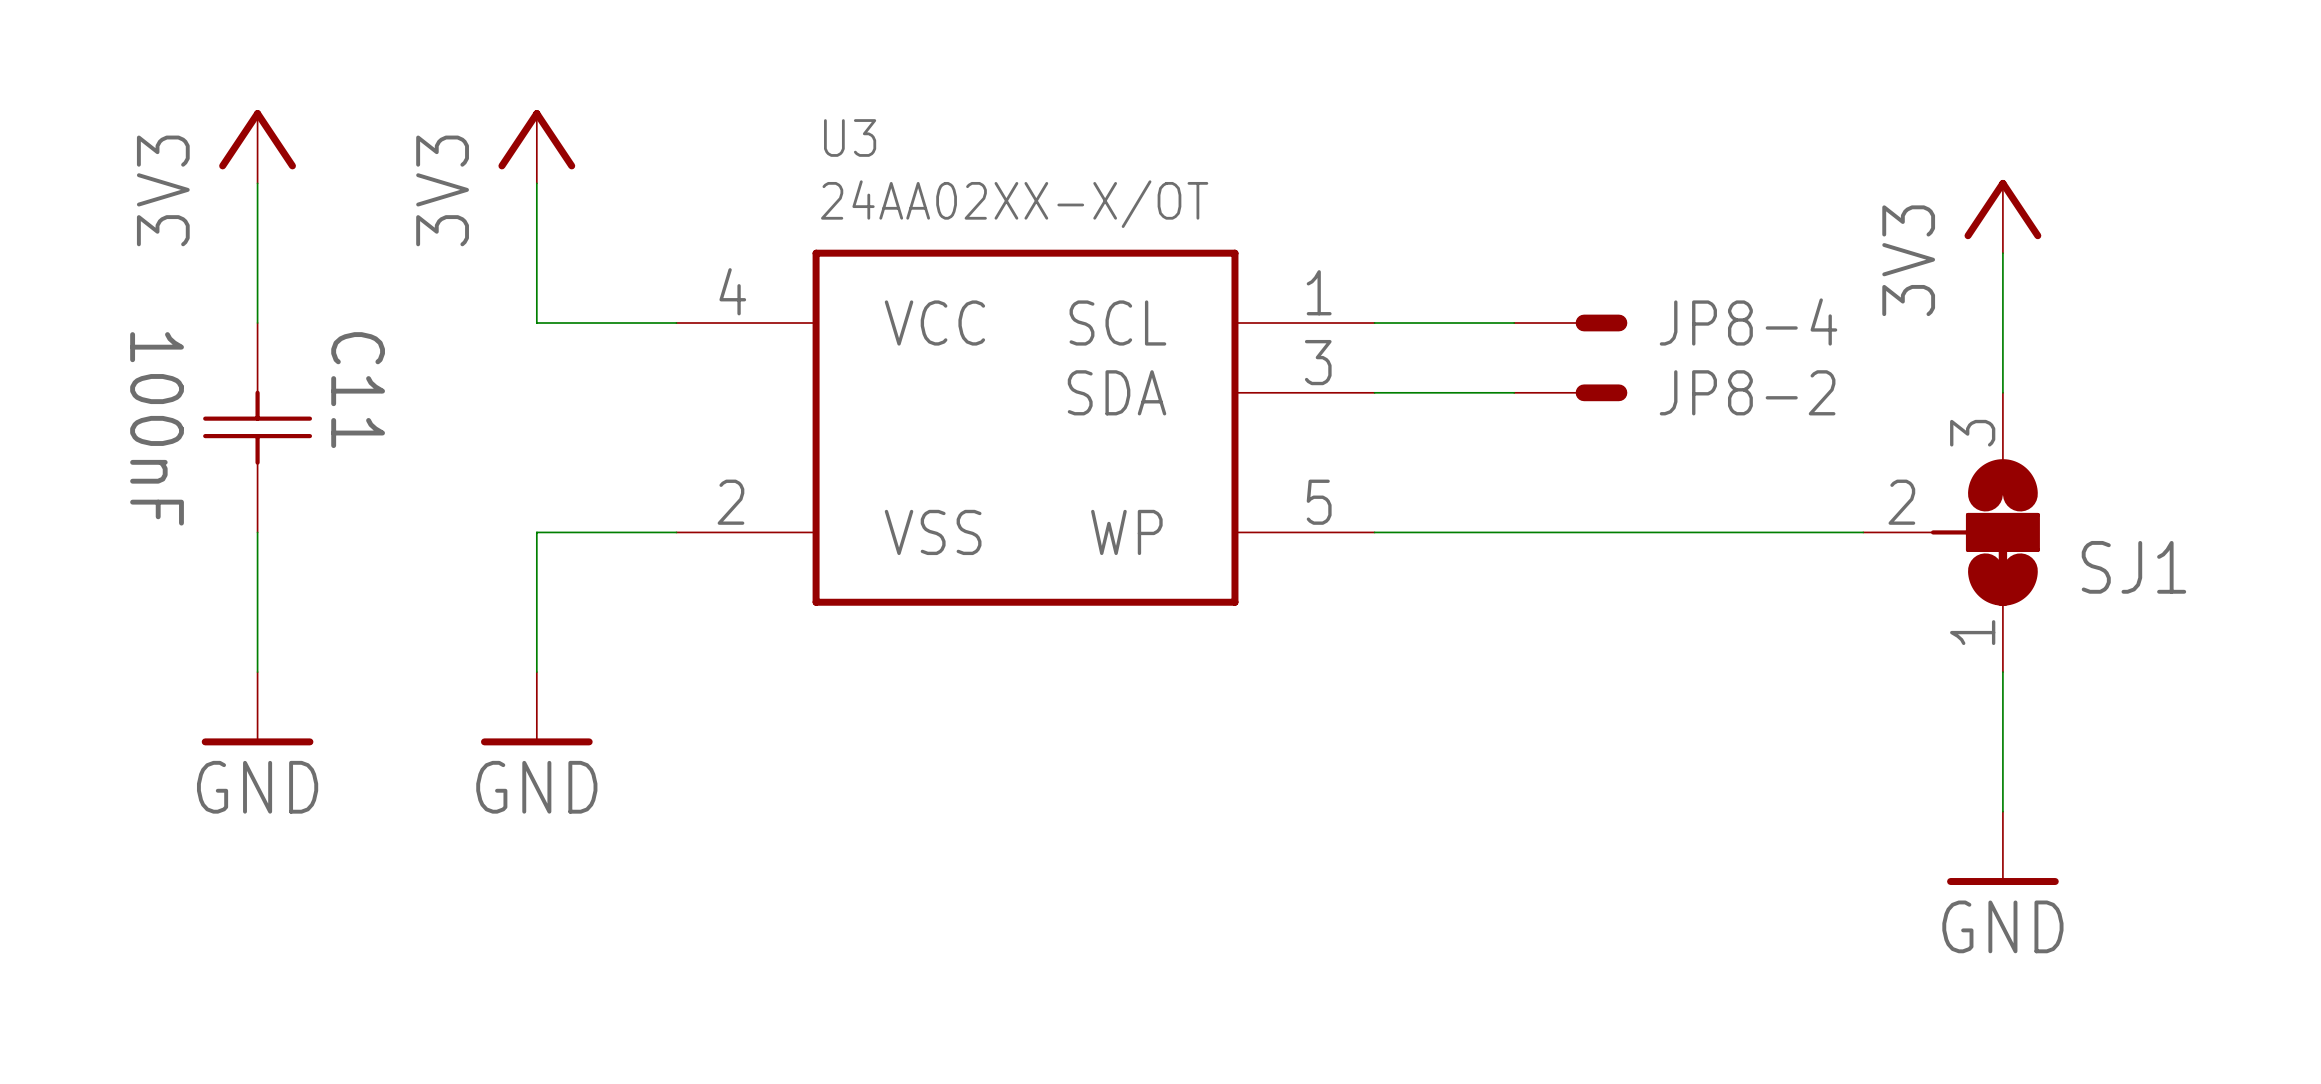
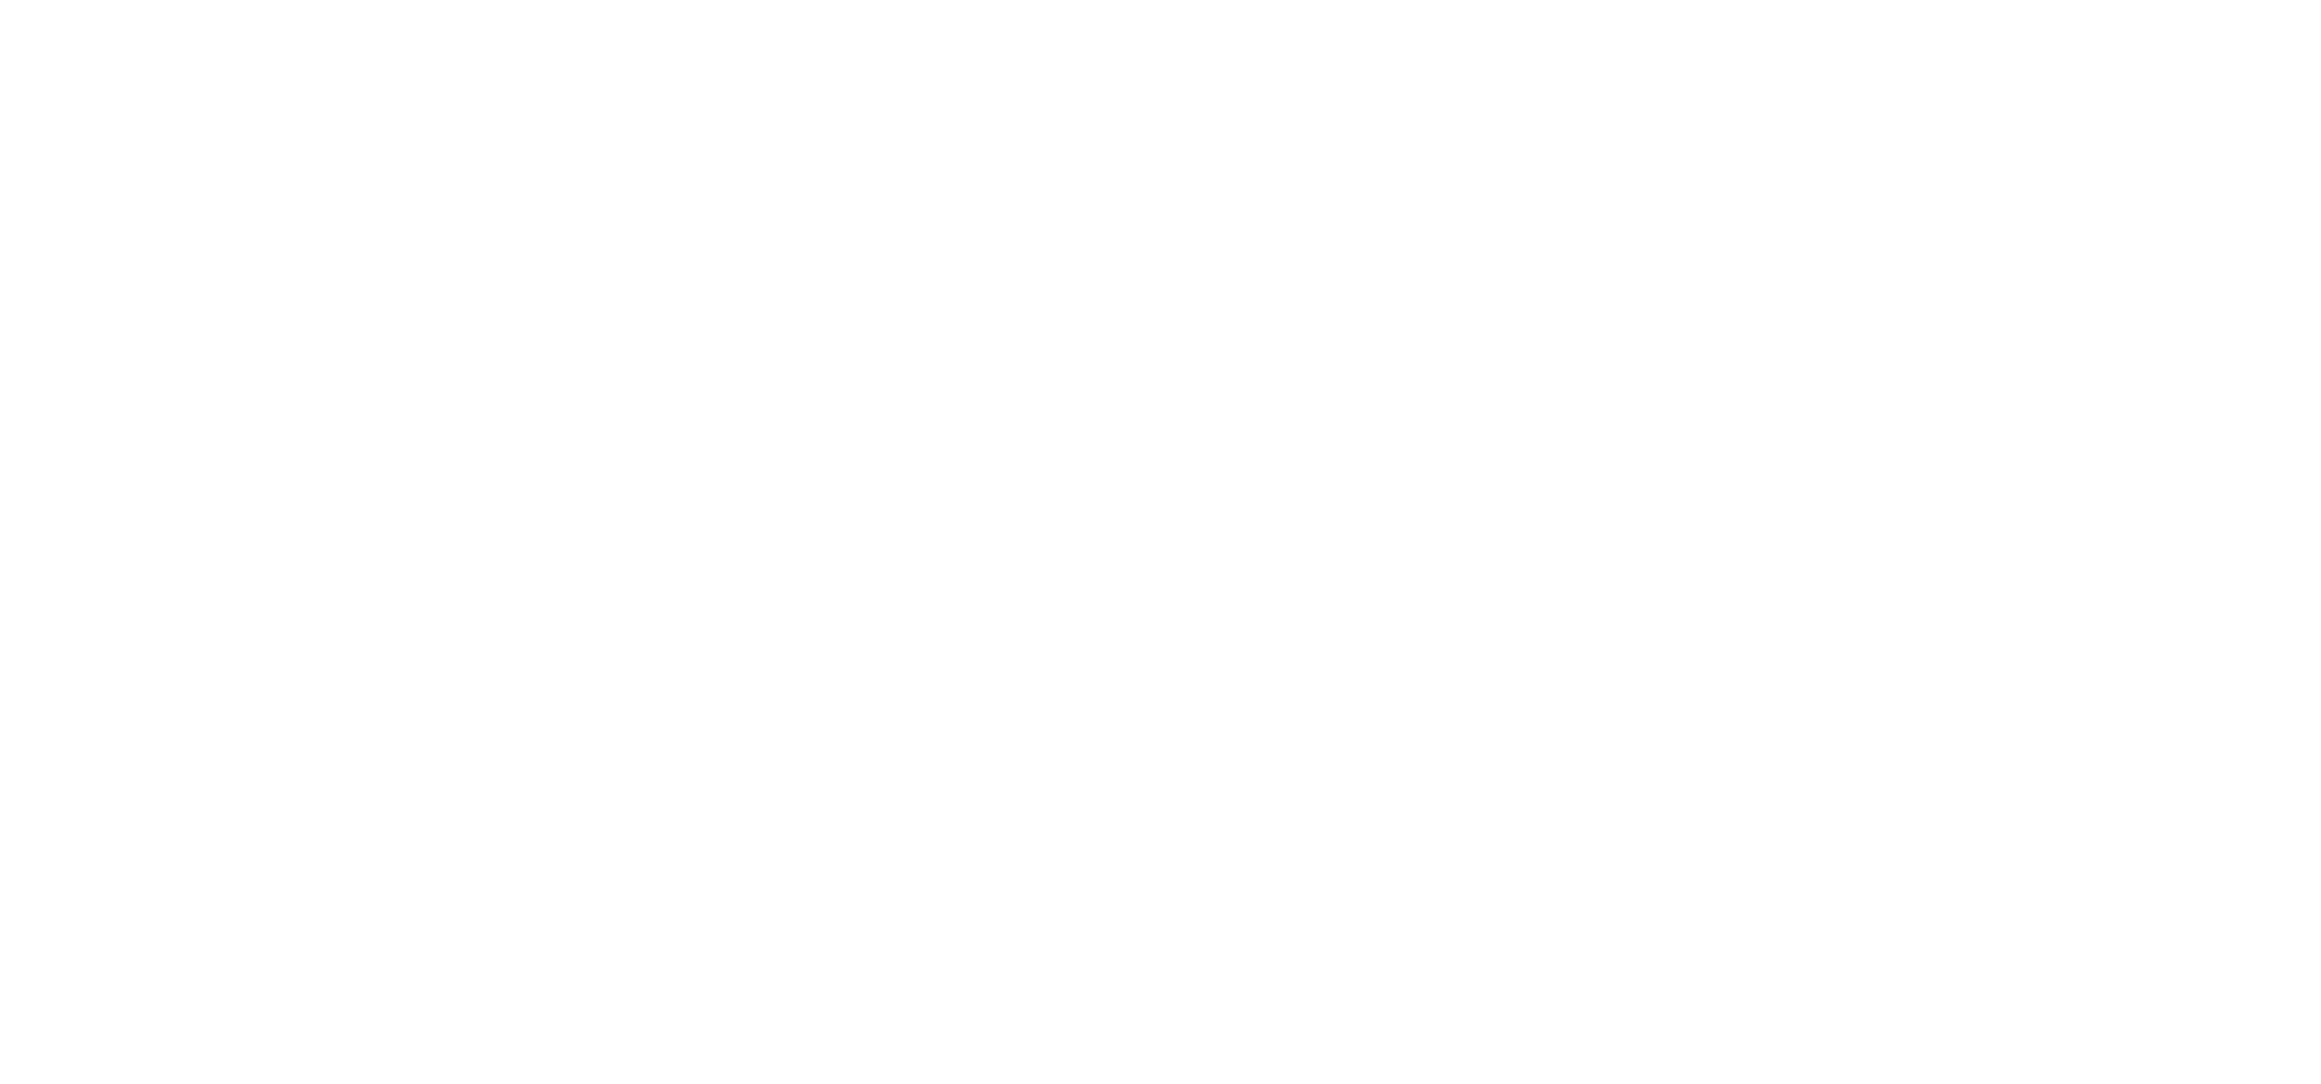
power symbol: 3V3 (257, 146) -> none
power symbol: 3V3 (536, 146) -> none
wire: (257, 183) (257, 323) -> none
wire: (536, 183) (536, 323) (676, 323) -> none
power symbol: 3V3 (2002, 216) -> none
wire: (2002, 253) (2002, 392) -> none
wire: (1374, 323) (1514, 323) -> none
JP8-4: (1570, 323) -> none
wire: (1374, 392) (1514, 392) -> none
JP8-2: (1570, 392) -> none
C11: 100nF (257, 427) -> none
U3: 24AA02XX-X/OT (1025, 427) -> none
wire: (257, 532) (257, 672) -> none
wire: (676, 532) (536, 532) (536, 672) -> none
wire: (1374, 532) (1863, 532) -> none
SJ1: (1951, 532) -> none
wire: (2002, 672) (2002, 811) -> none
power symbol: GND (257, 708) -> none
power symbol: GND (536, 708) -> none
power symbol: GND (2002, 848) -> none

